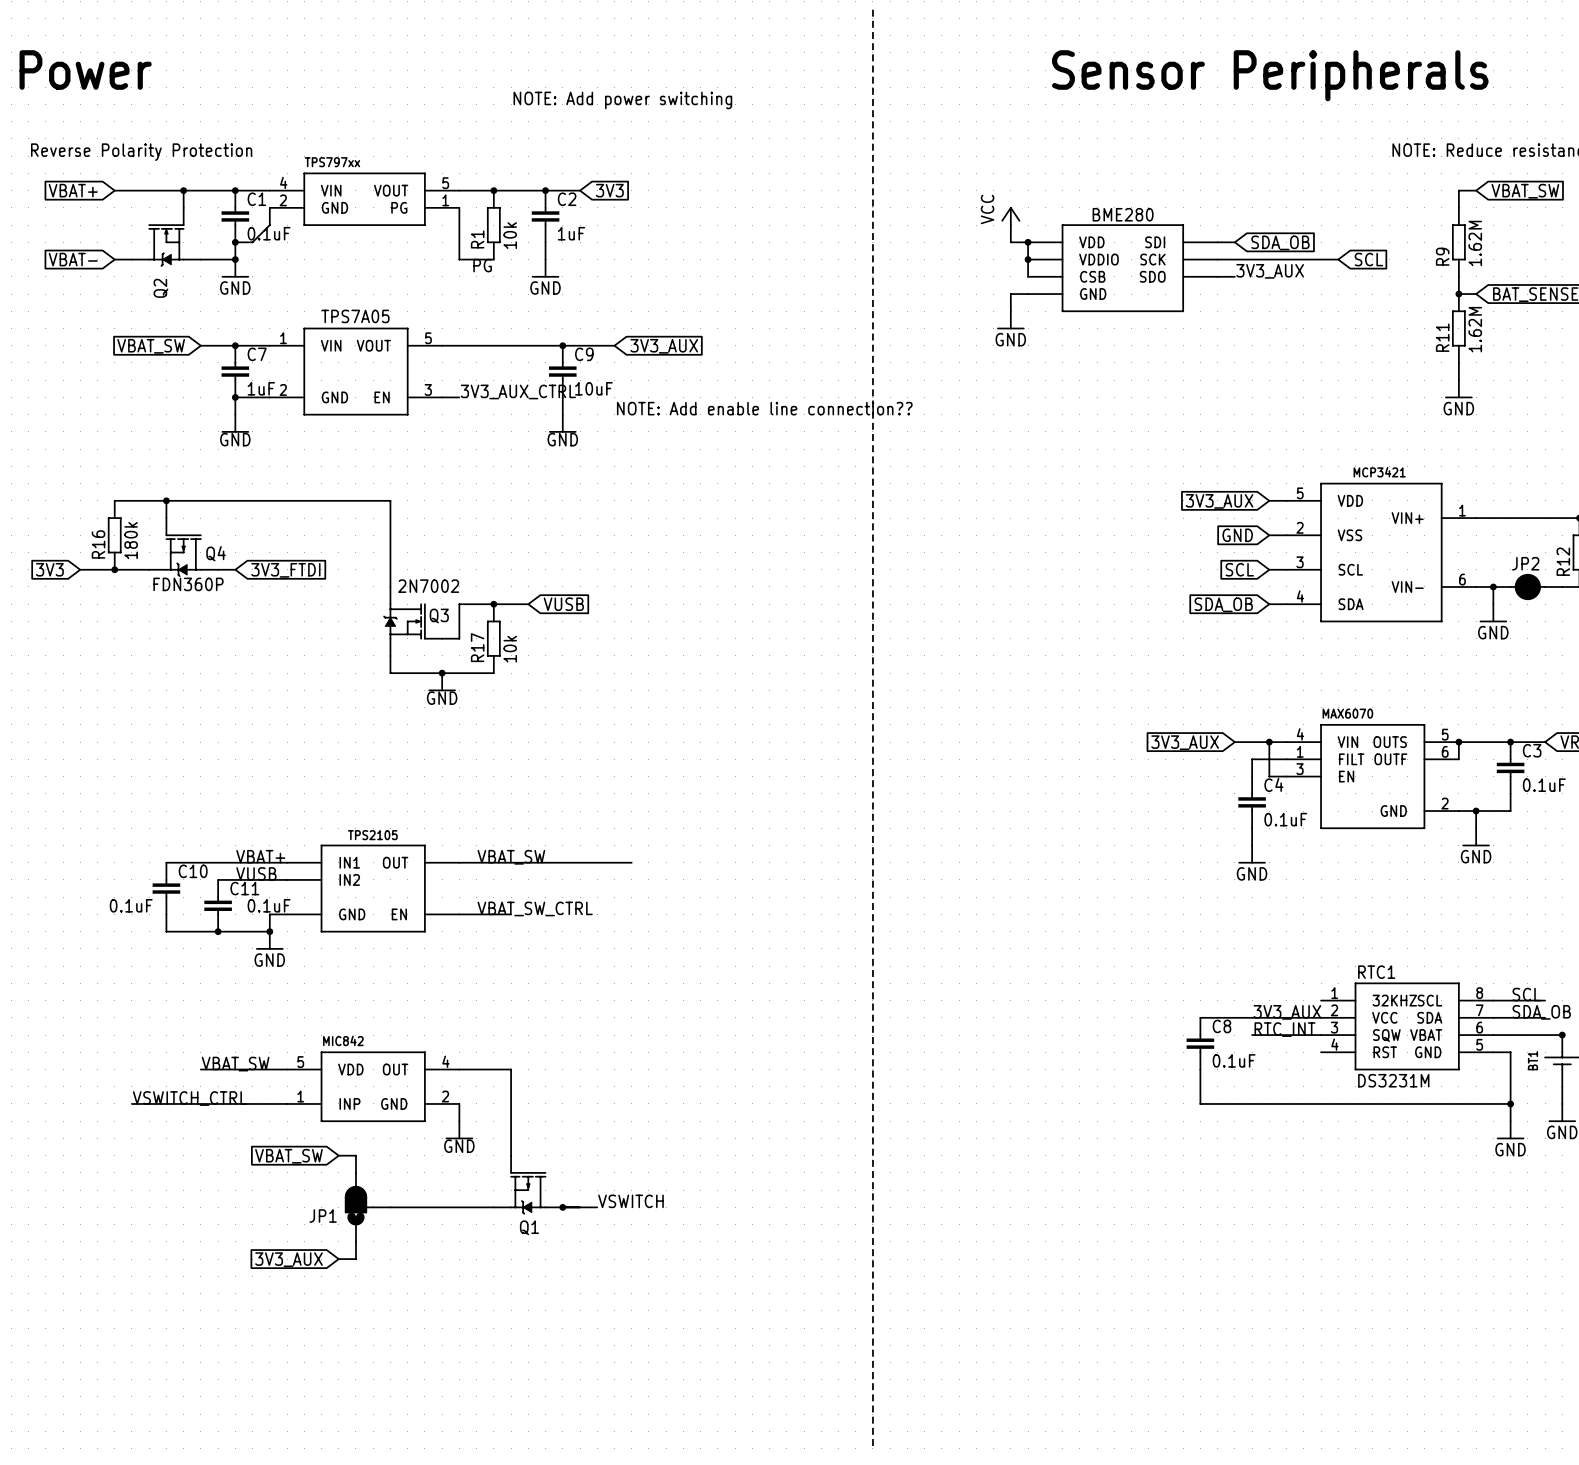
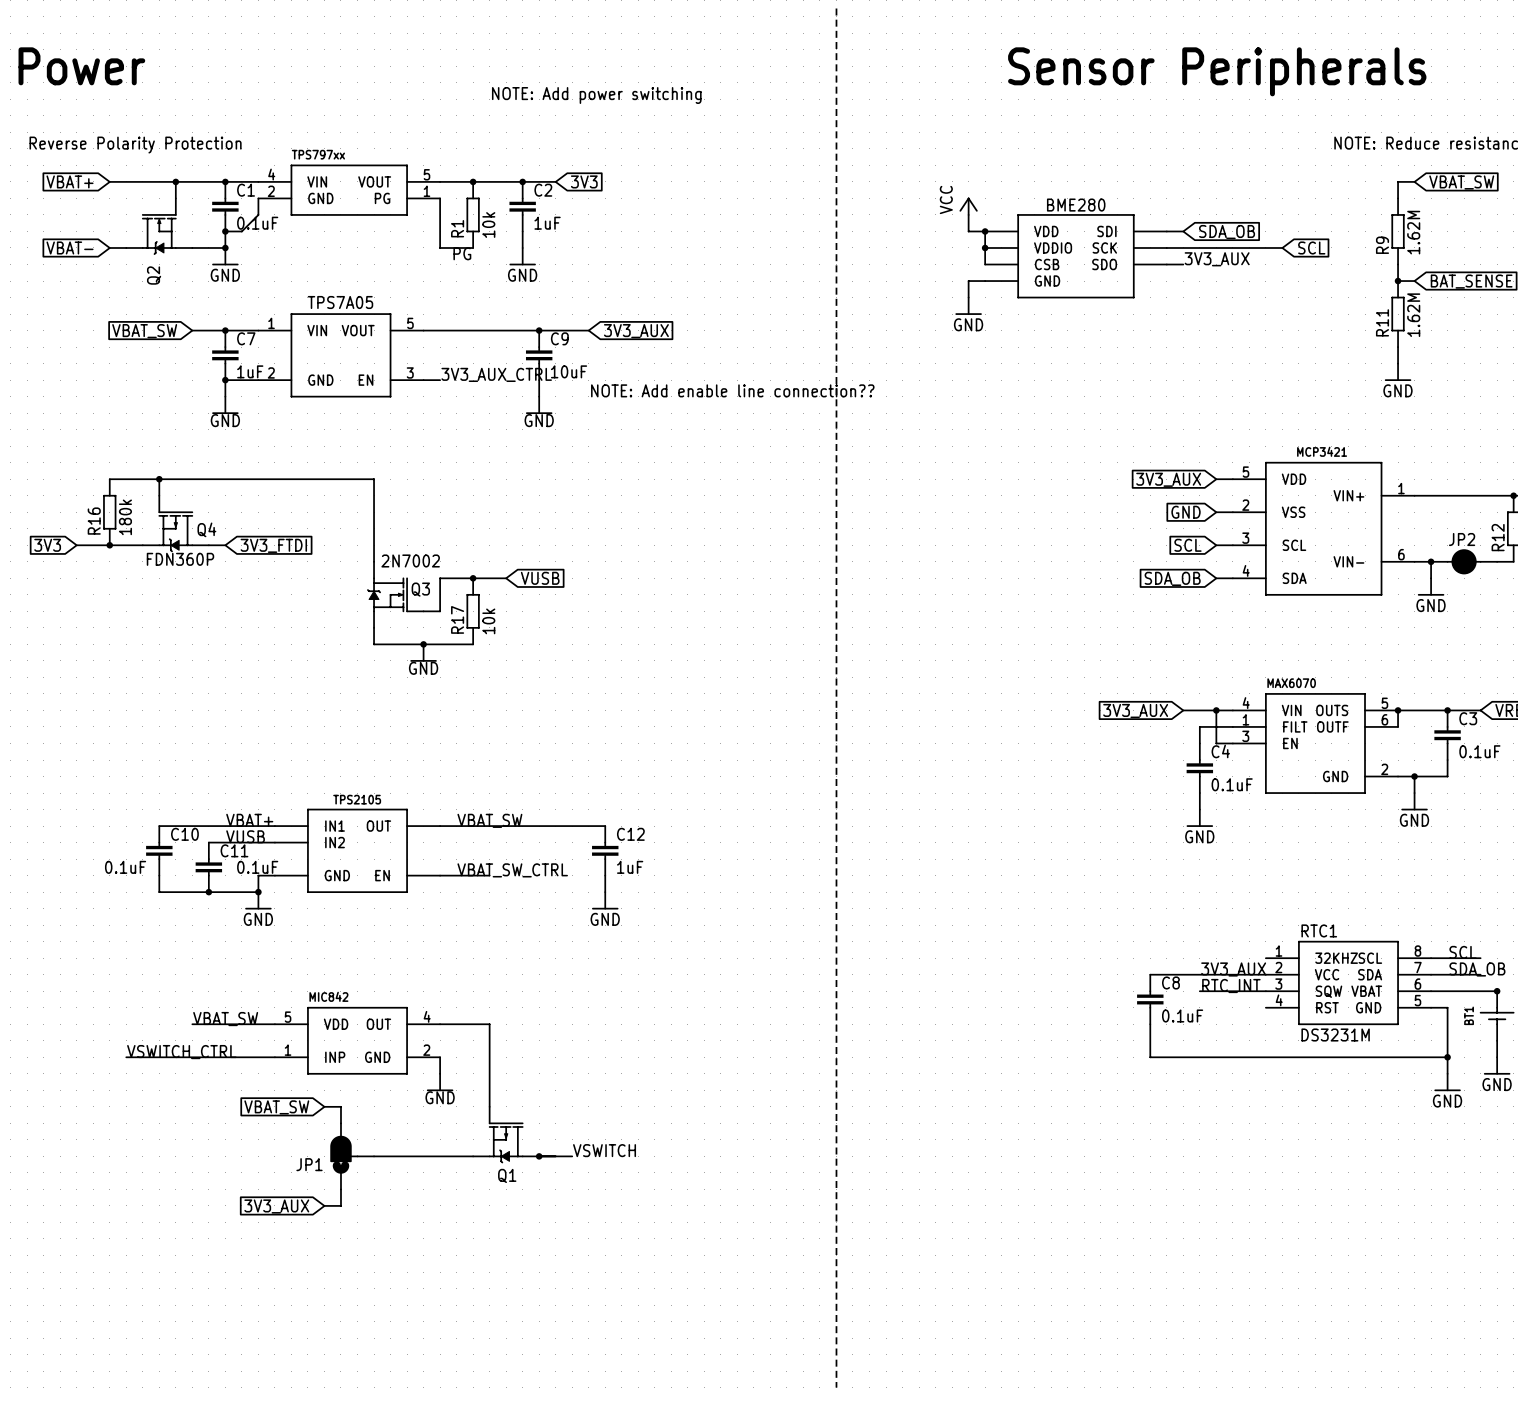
C12: none -> 1uF (605, 850)
wire: none -> (605, 875) (605, 892)
power symbol: none -> GND (605, 900)

